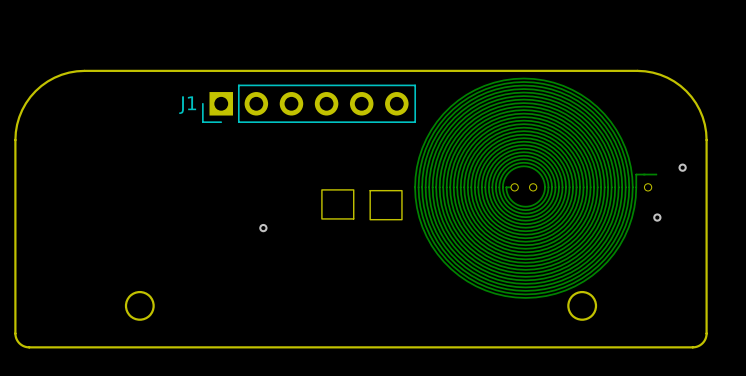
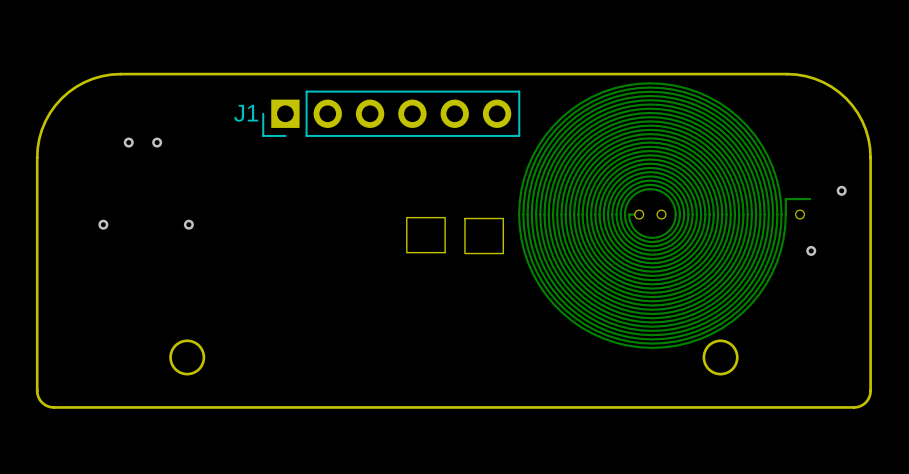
via: none -> (128, 142)
via: none -> (157, 142)
via: none -> (103, 224)
via: none -> (188, 224)
via: (263, 228) -> none

